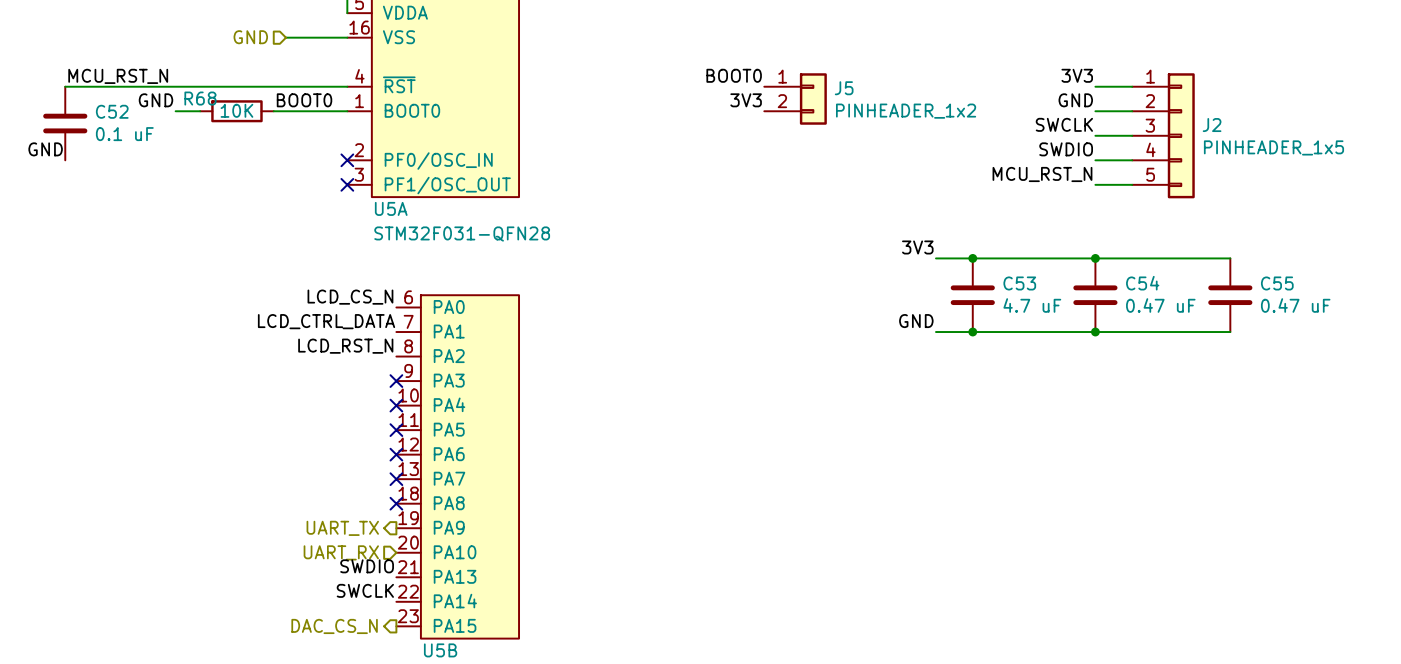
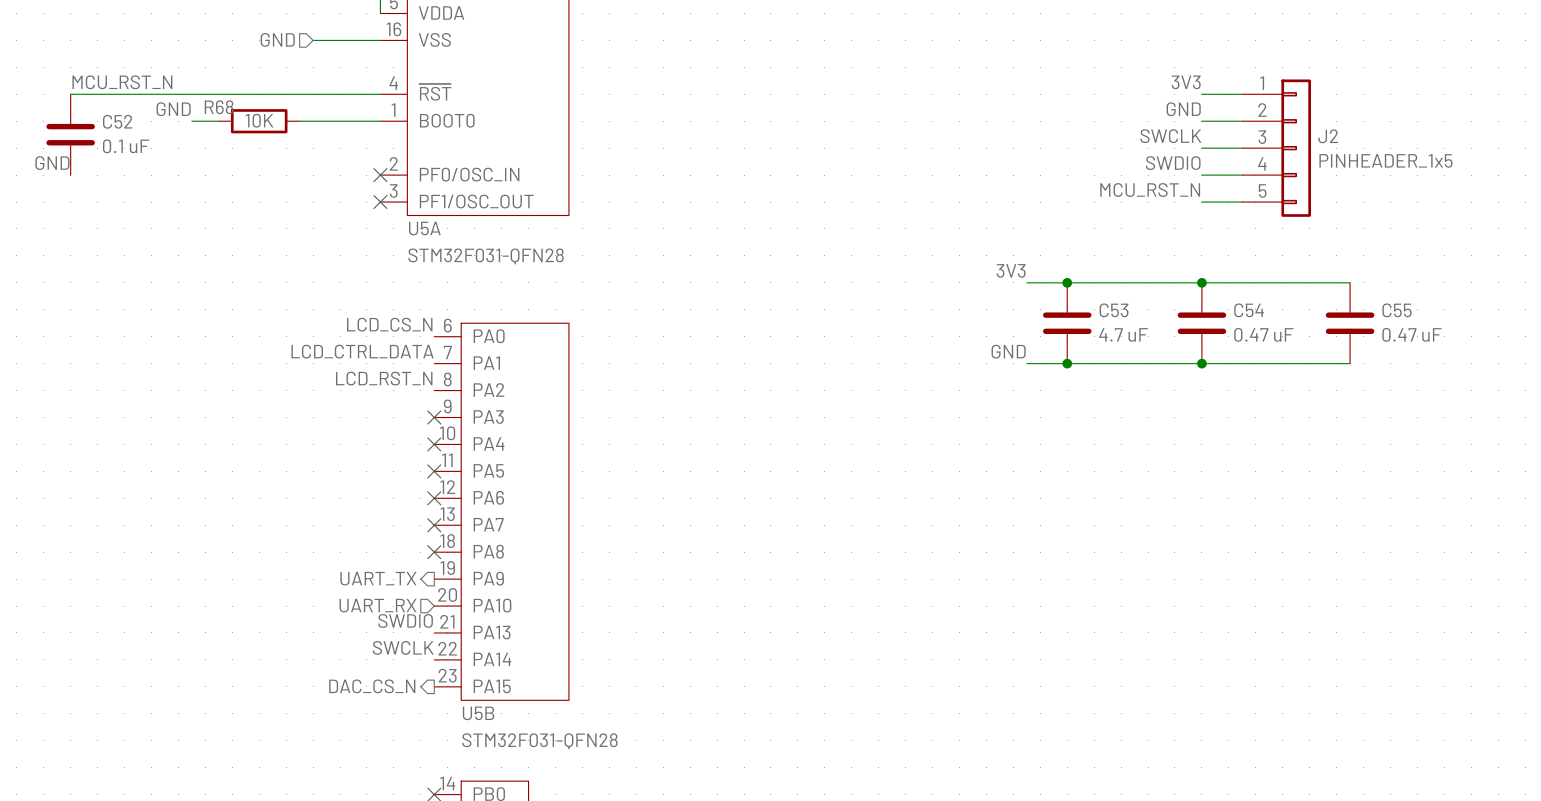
label: BOOT0 (734, 75) -> none
J5: PINHEADER_1x2 (795, 99) -> none
label: BOOT0 (304, 100) -> none
label: 3V3 (746, 100) -> none

